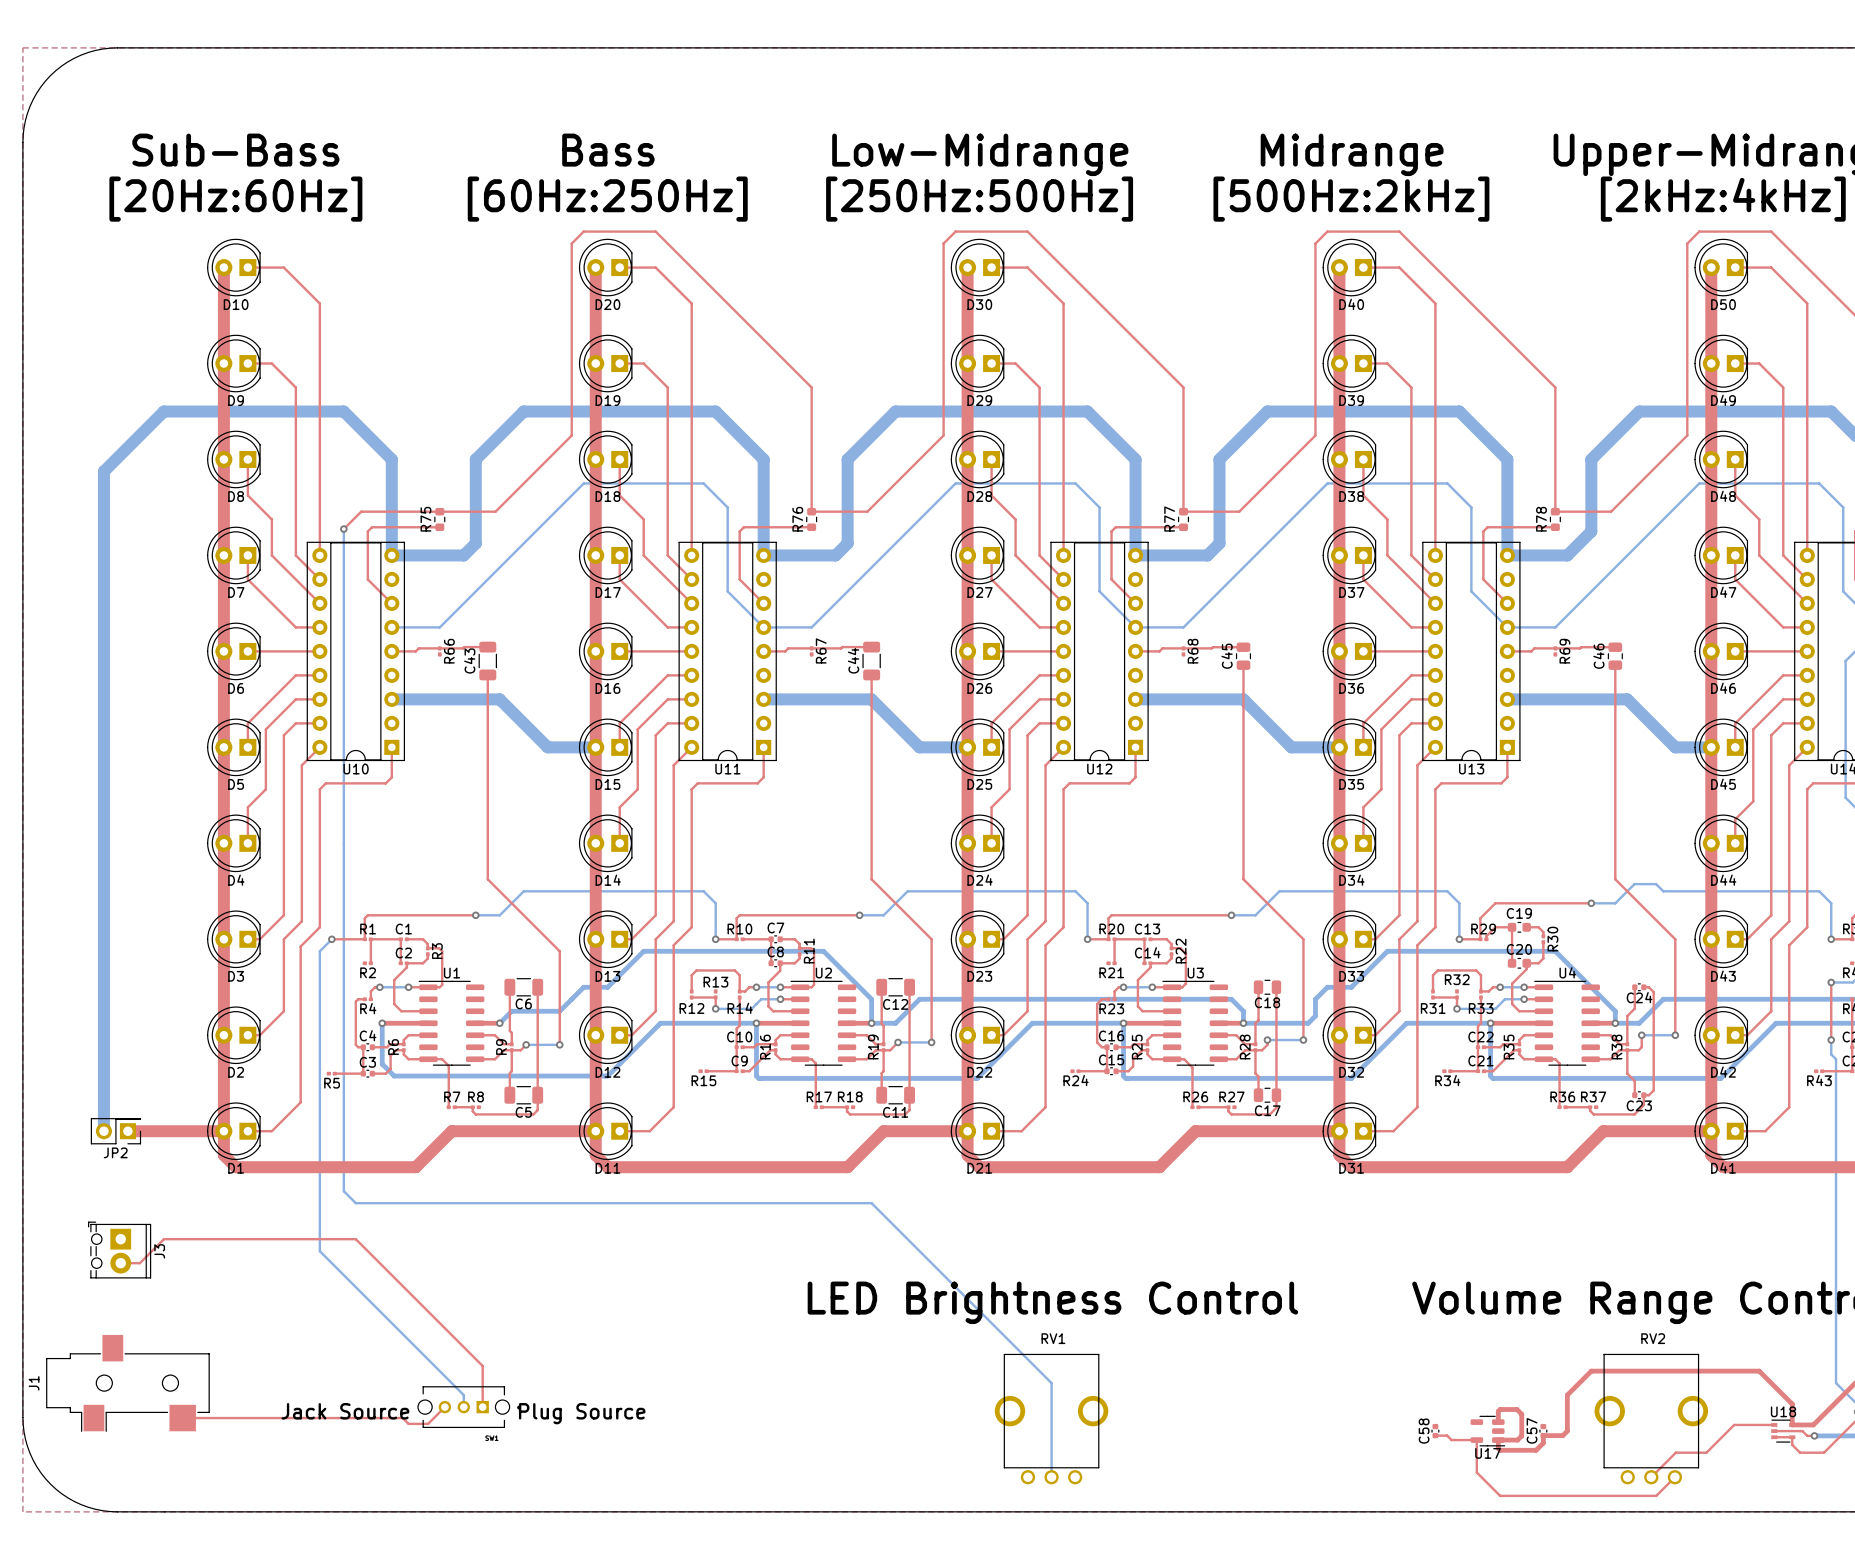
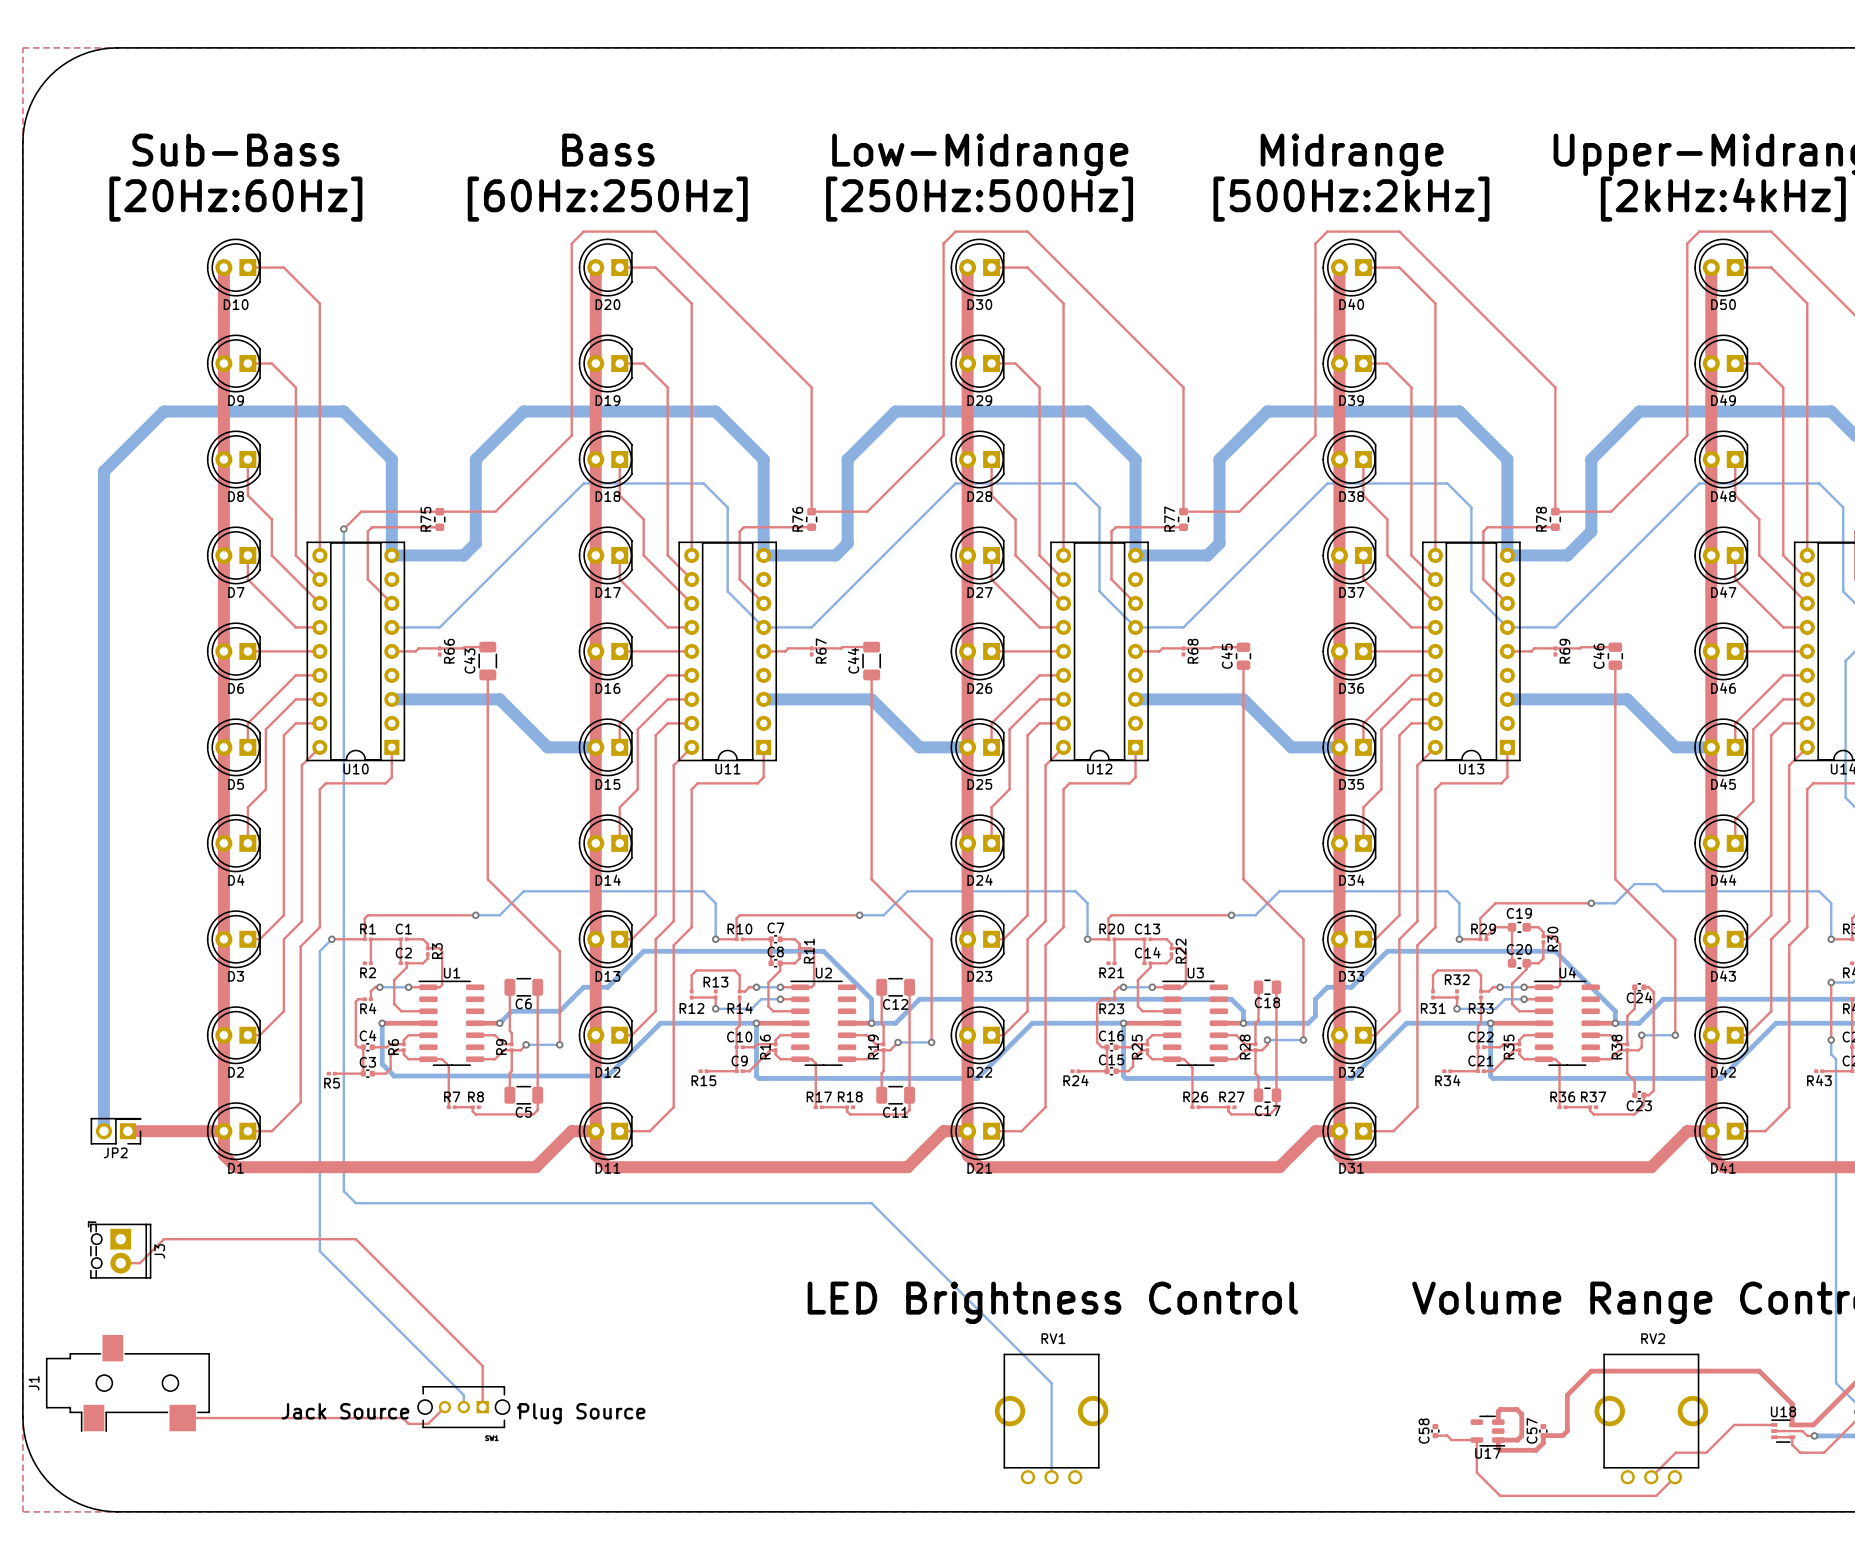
top track: none -> (1543, 936) (1552, 936) (1560, 944) (1560, 984) (1557, 987) (1543, 987)
top track: (571, 1131) (451, 1131) (415, 1167) -> (571, 1131) (535, 1167) (415, 1167)
top track: (943, 1131) (883, 1131) (847, 1167) -> (943, 1131) (907, 1167) (847, 1167)
top track: (1315, 1131) (1195, 1131) (1159, 1167) -> (1315, 1131) (1279, 1167) (1159, 1167)
top track: (1687, 1131) (1603, 1131) (1567, 1167) -> (1687, 1131) (1651, 1167) (1567, 1167)

